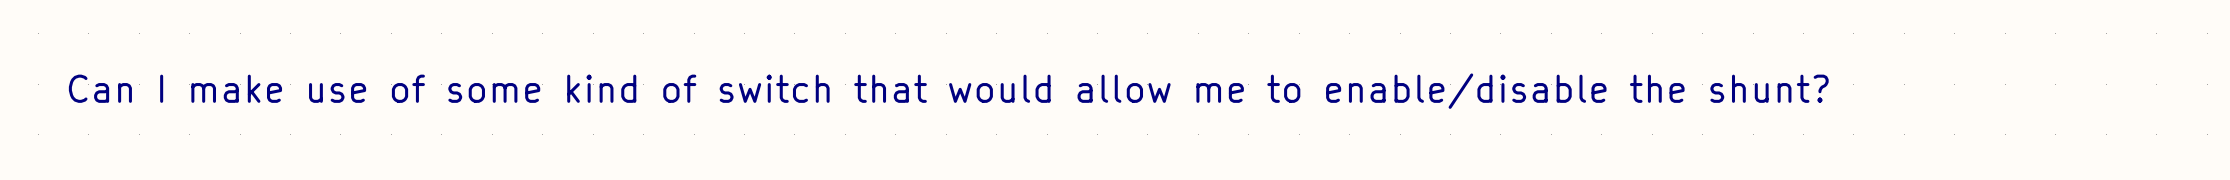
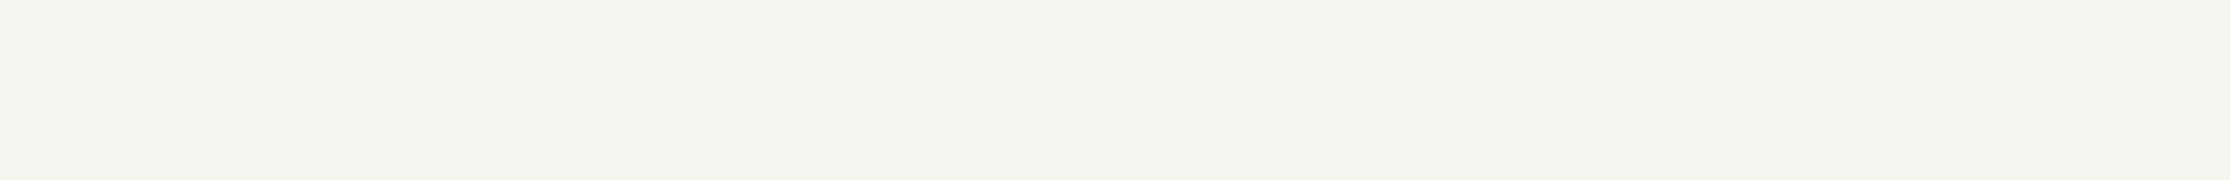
text: Can I make use of some kind of switch that would allow me to enable/disable the shunt? (948, 91) -> none

